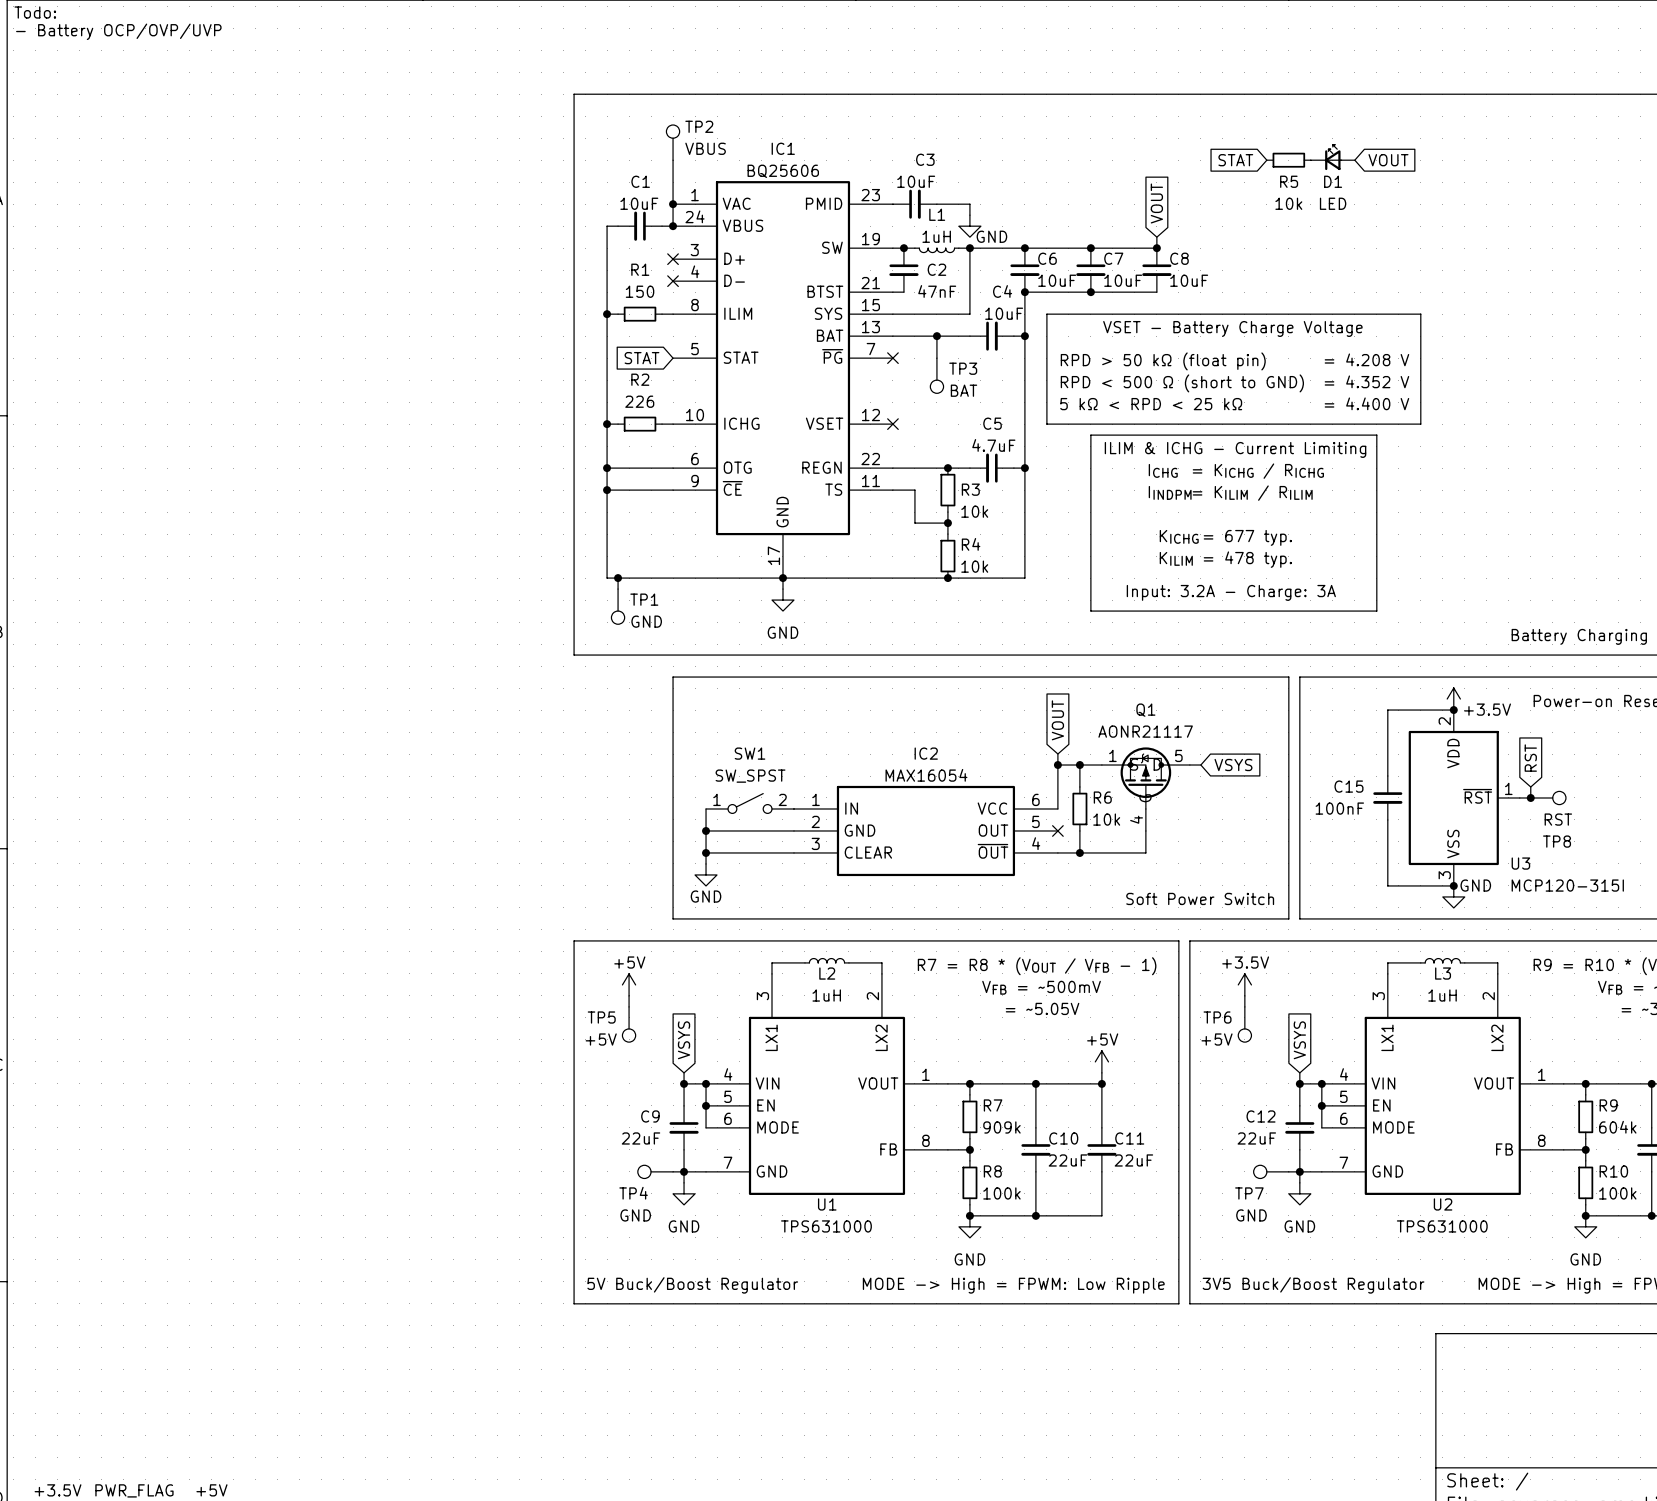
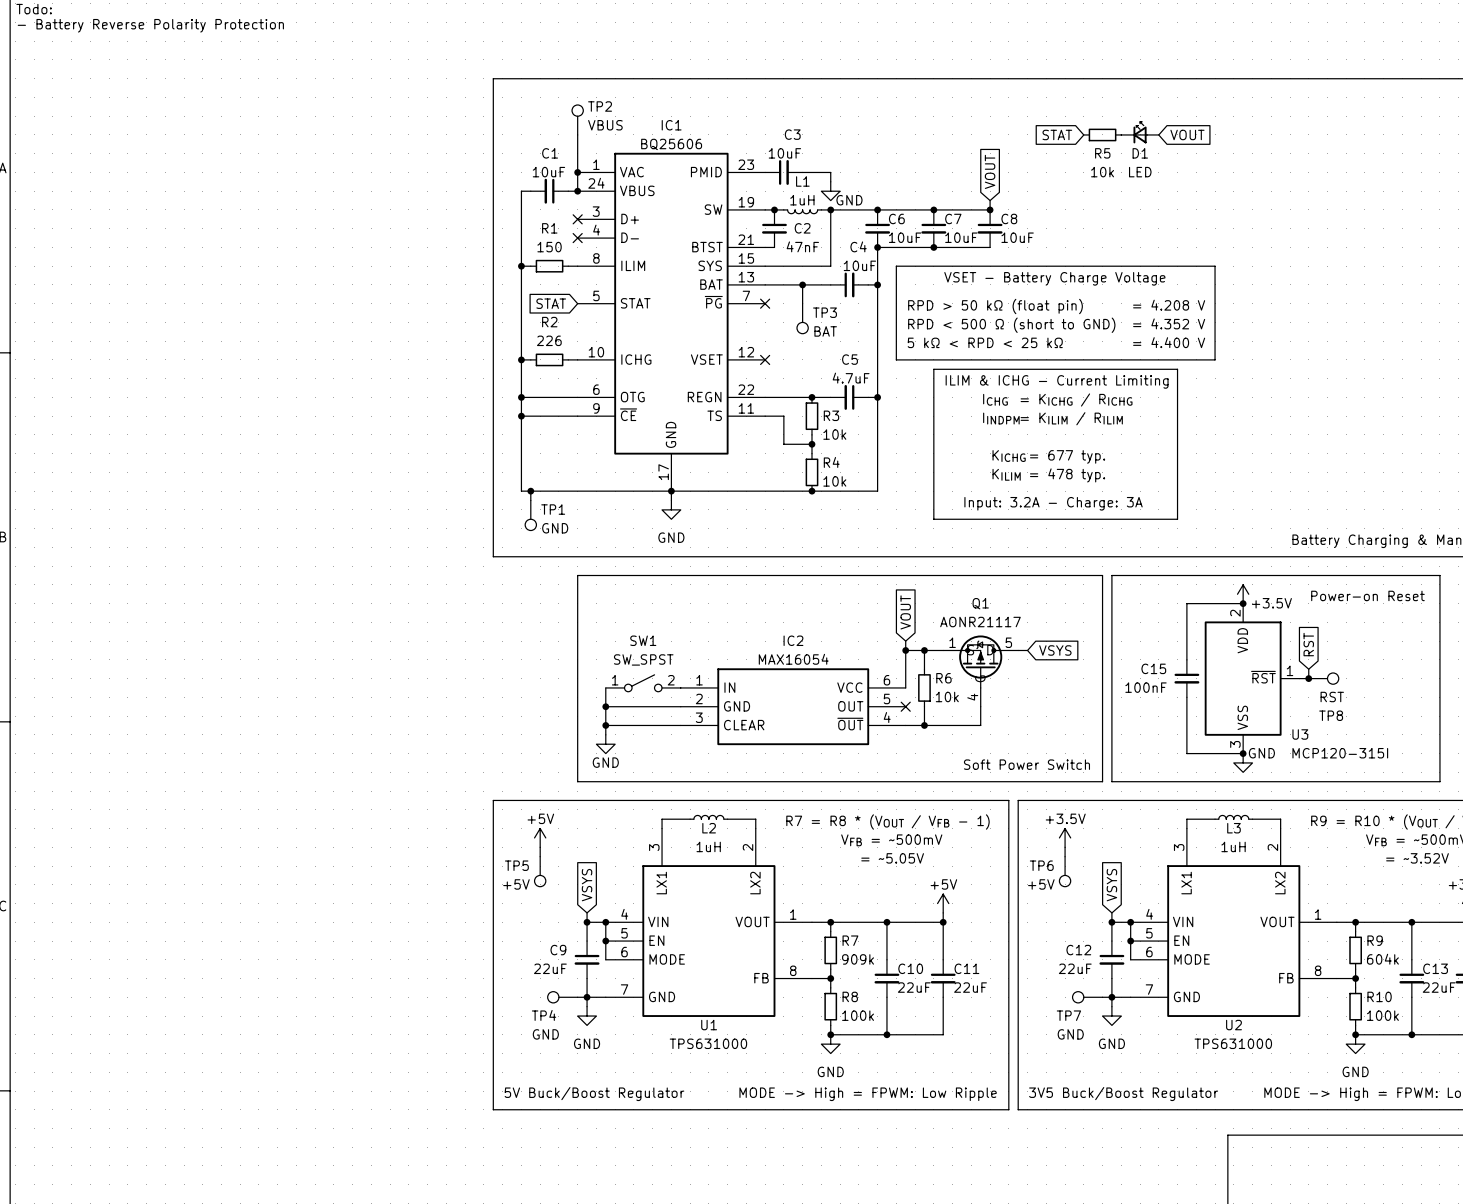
text: - Battery OCP/OVP/UVP (118, 31) -> - Battery Reverse Polarity Protection (150, 25)

